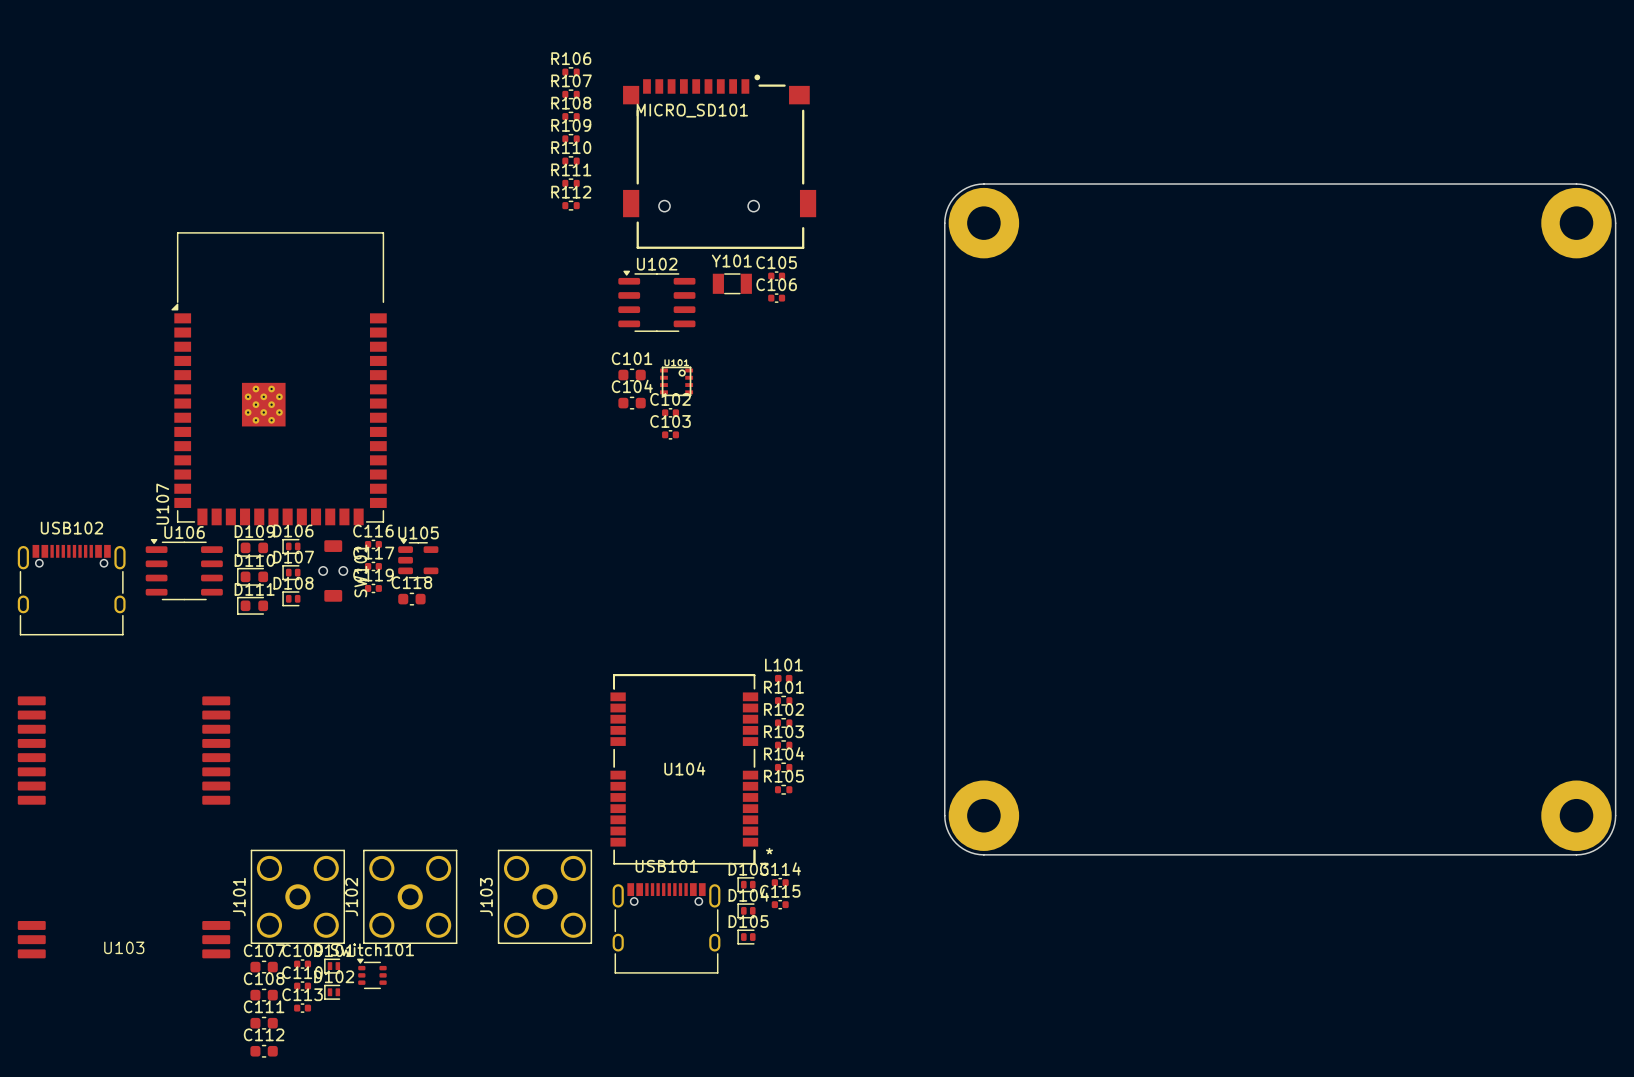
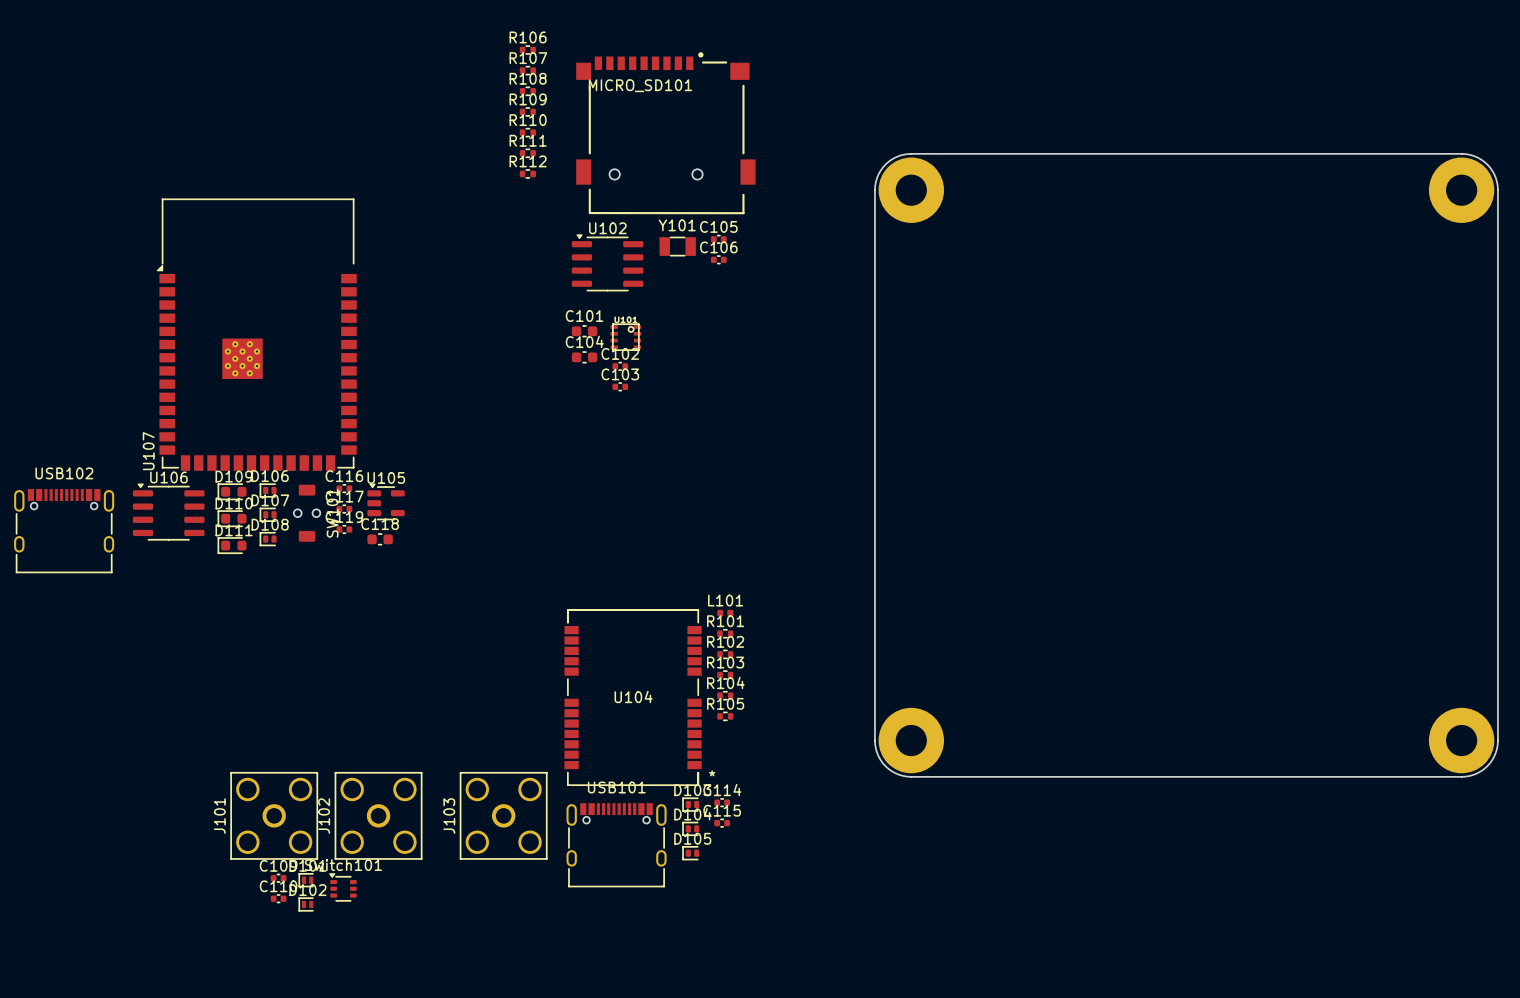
U103: (124, 827) -> none
C107: (264, 967) -> none
C108: (264, 995) -> none
C113: (302, 1008) -> none
C111: (264, 1023) -> none
C112: (264, 1051) -> none

